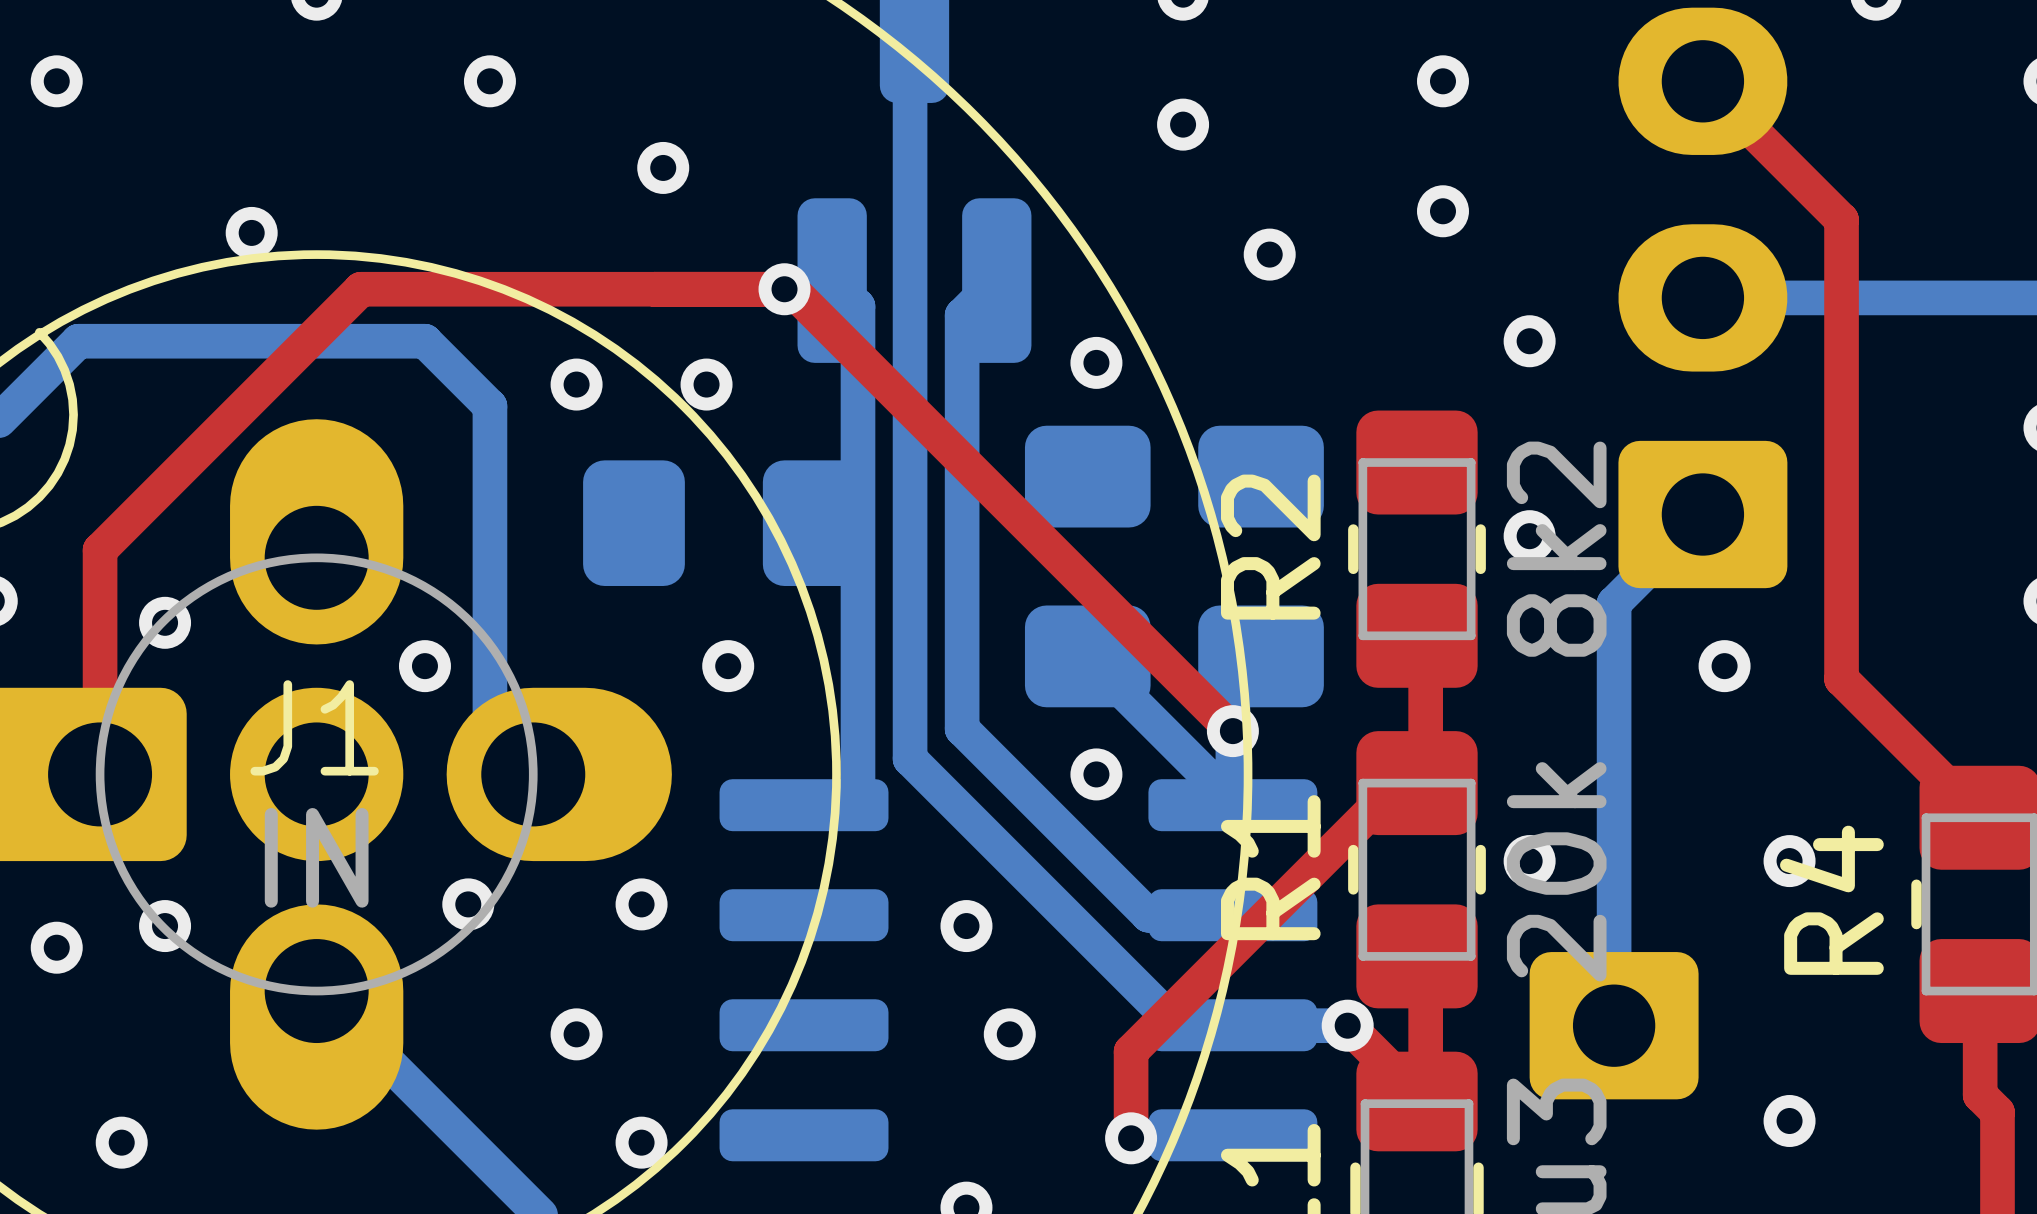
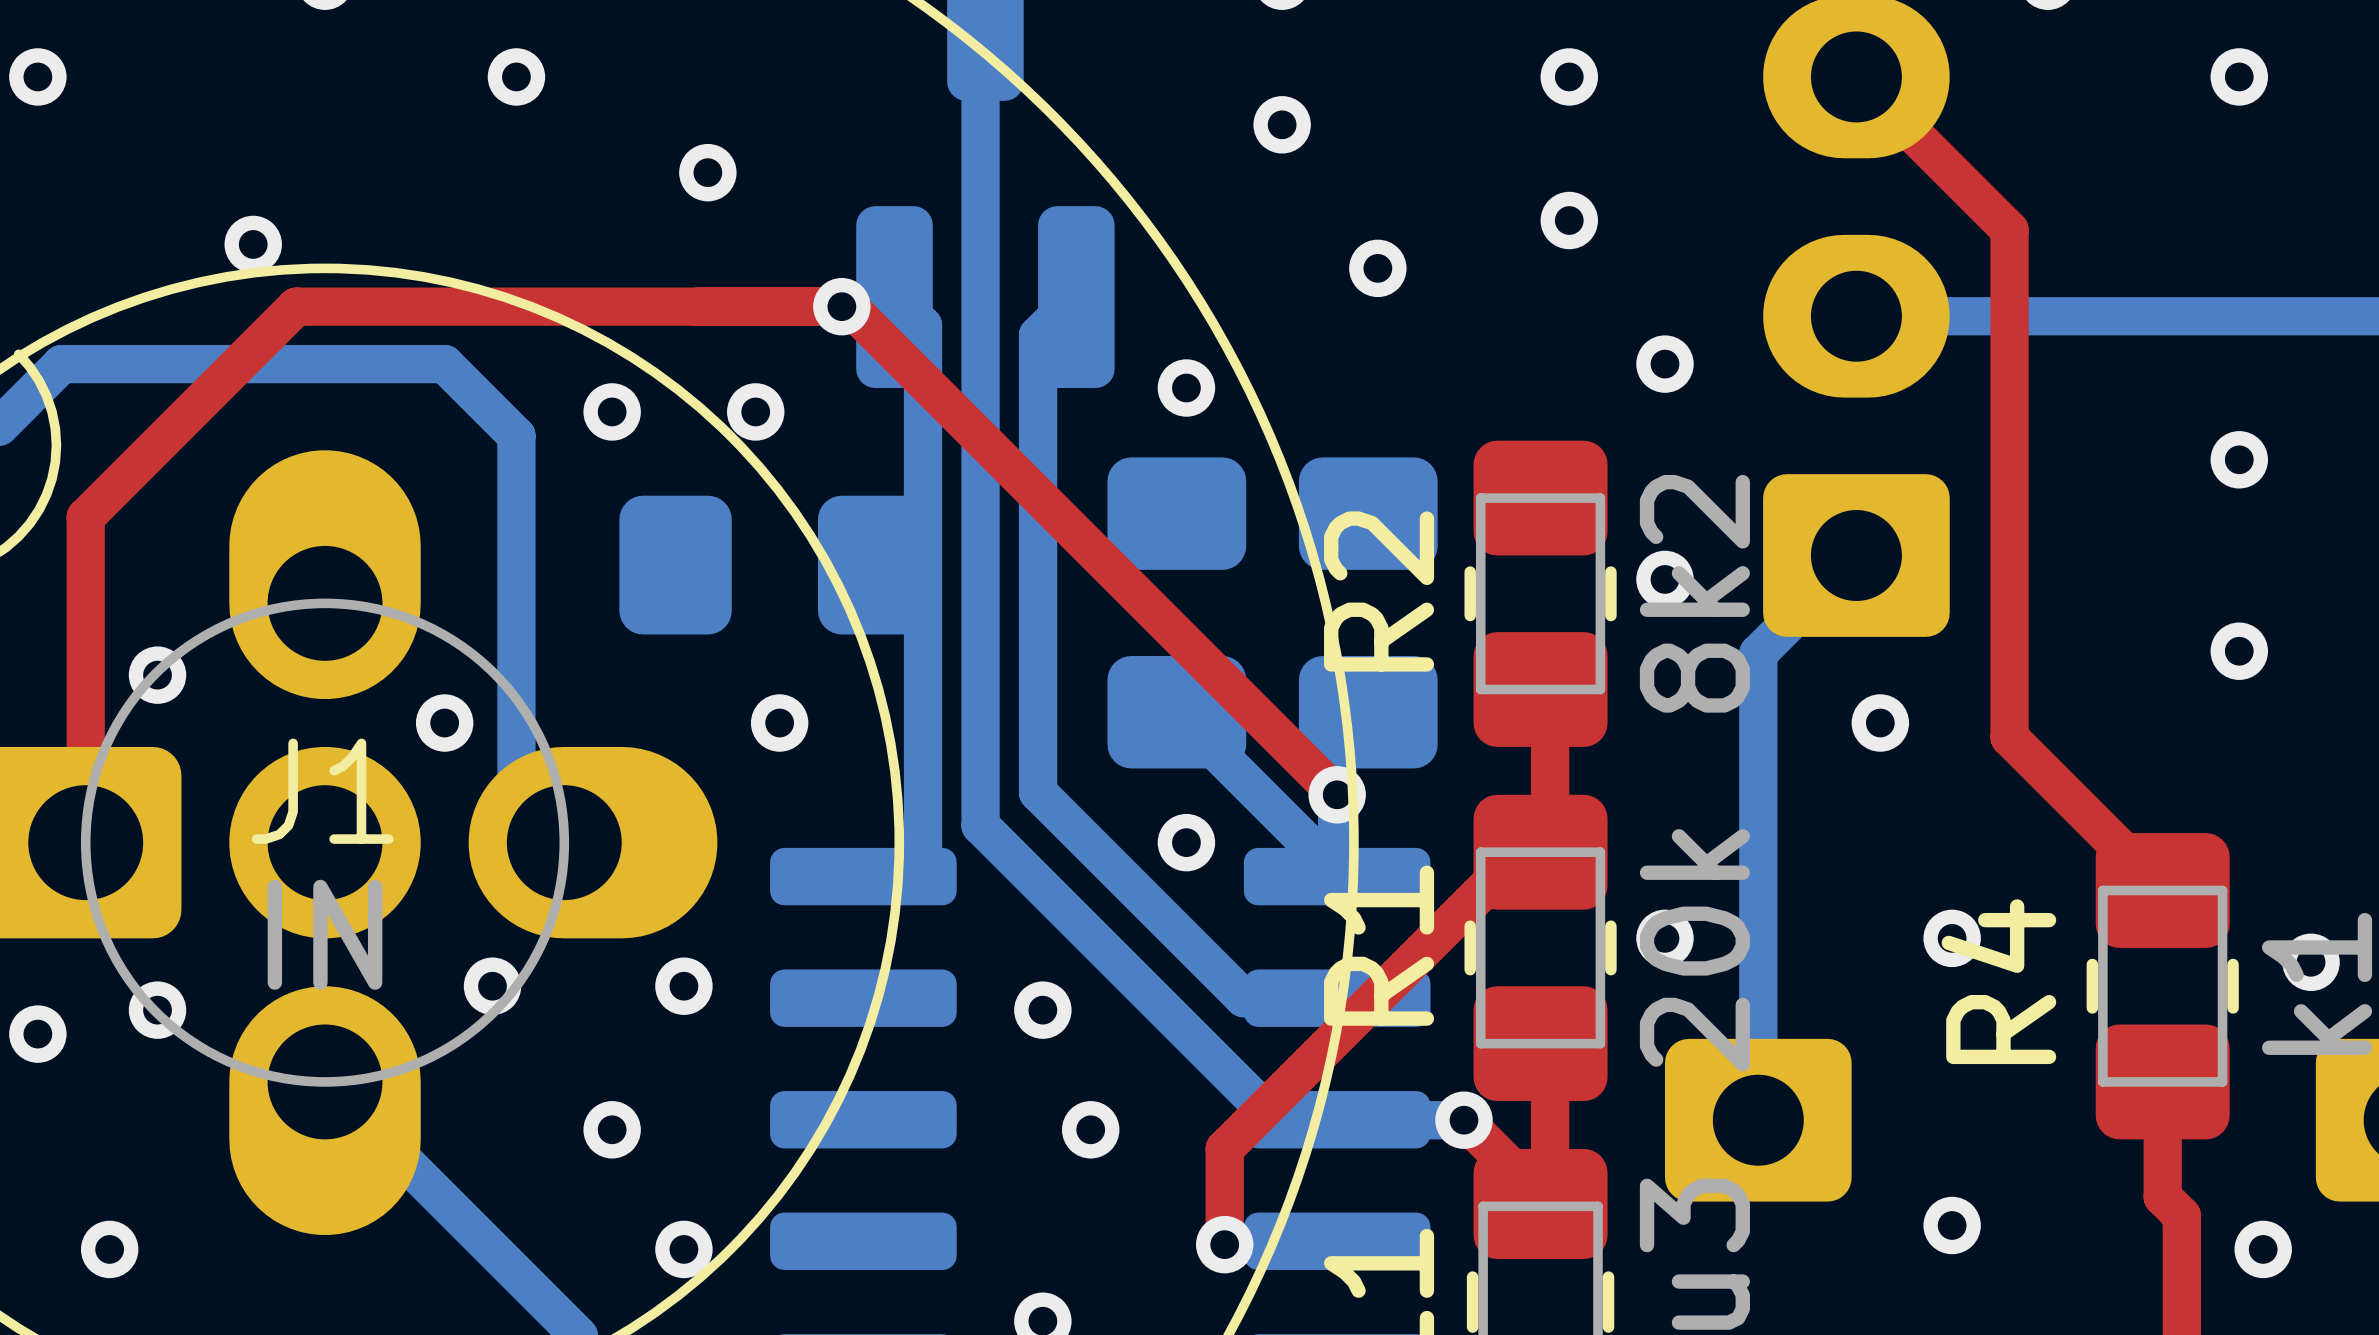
top track: (360, 289) (100, 550) -> (373, 306) (296, 306) (85, 517) (85, 594)

